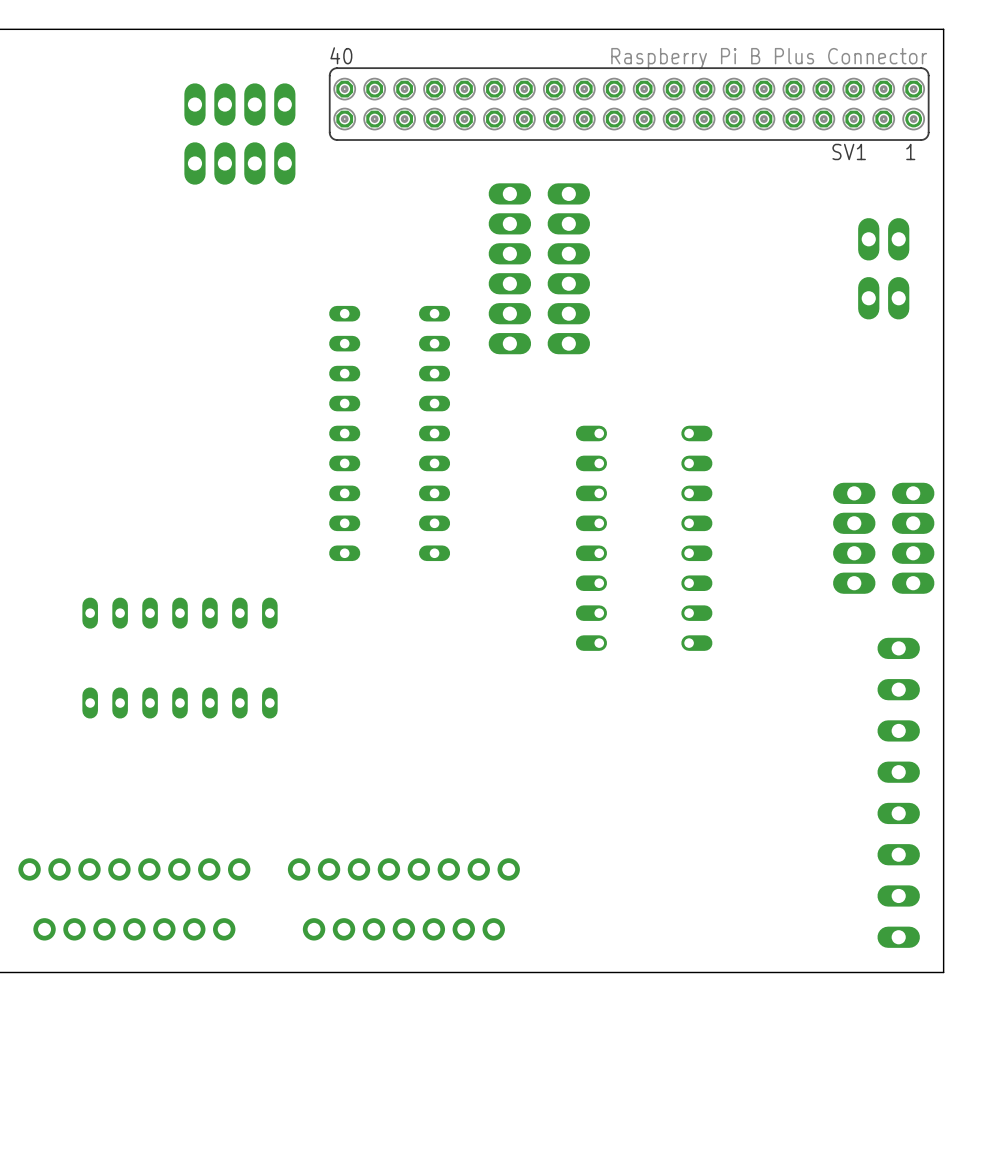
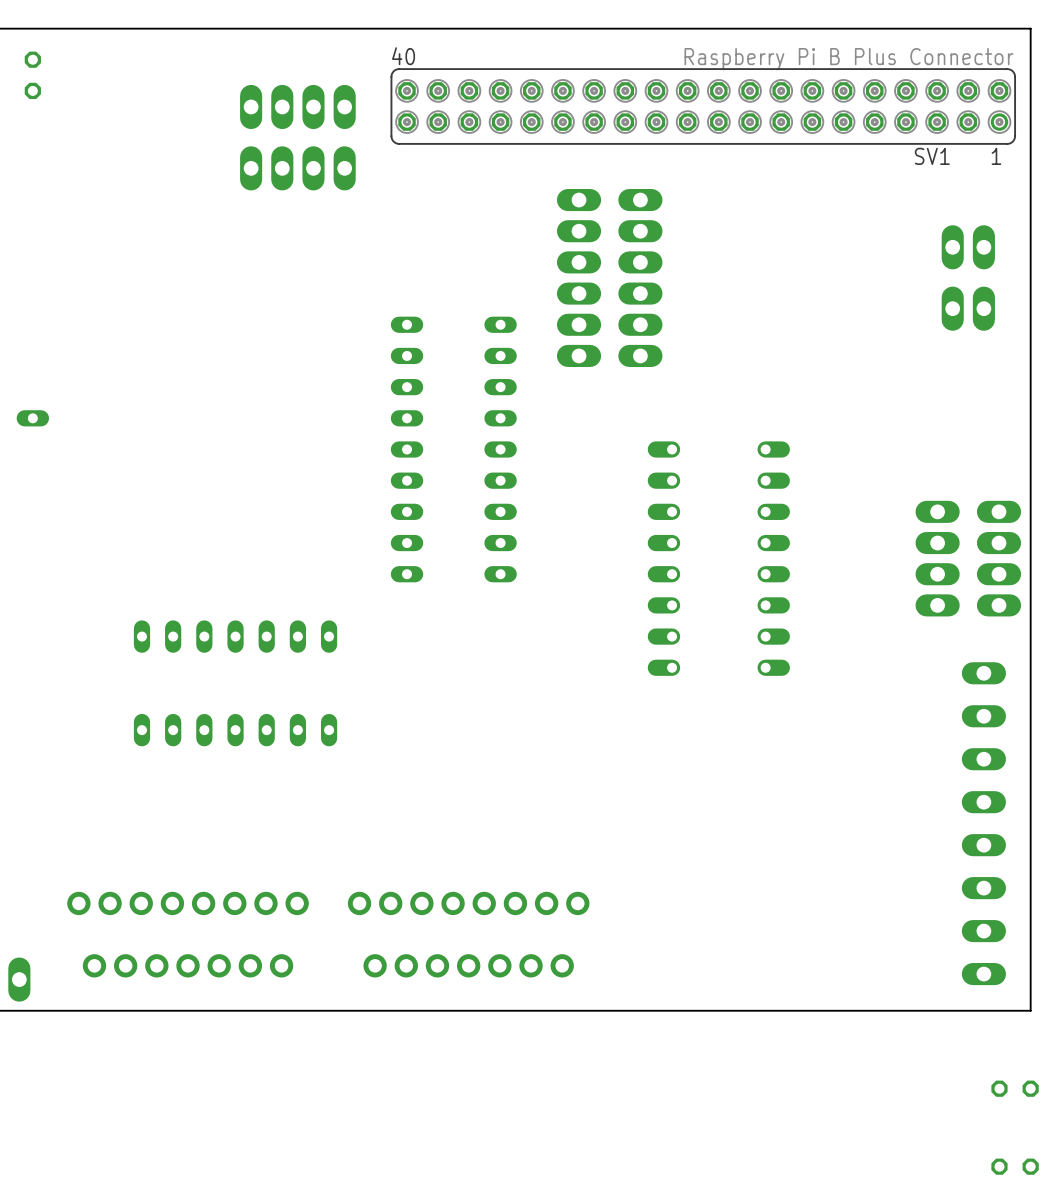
part: none -> (1015, 1088)
part: none -> (1015, 1166)

